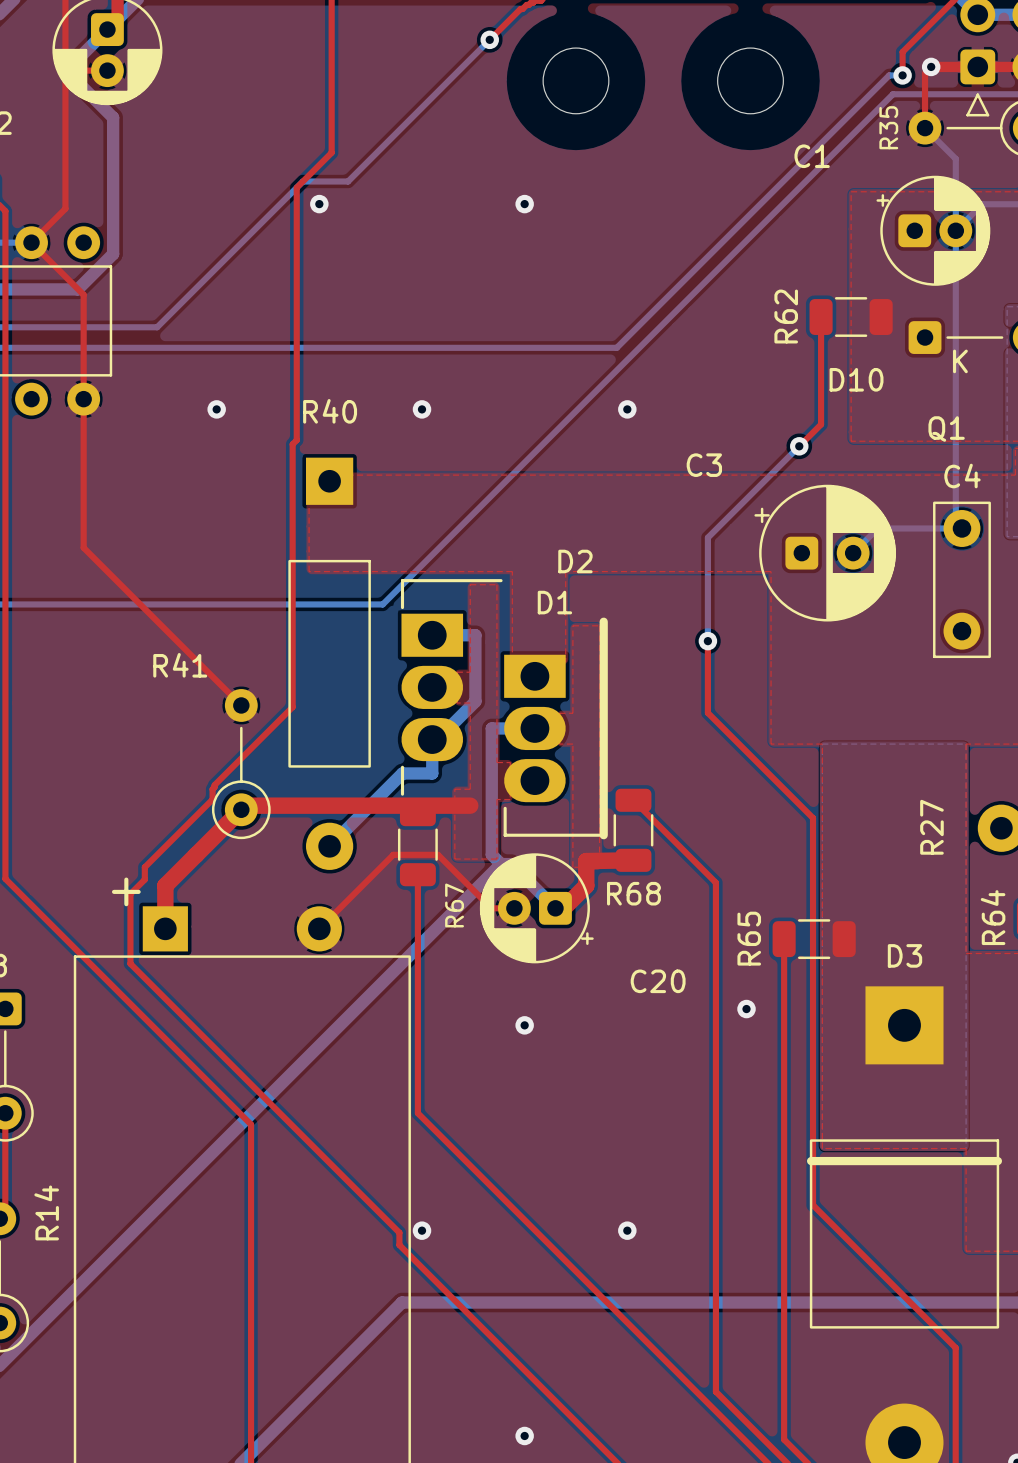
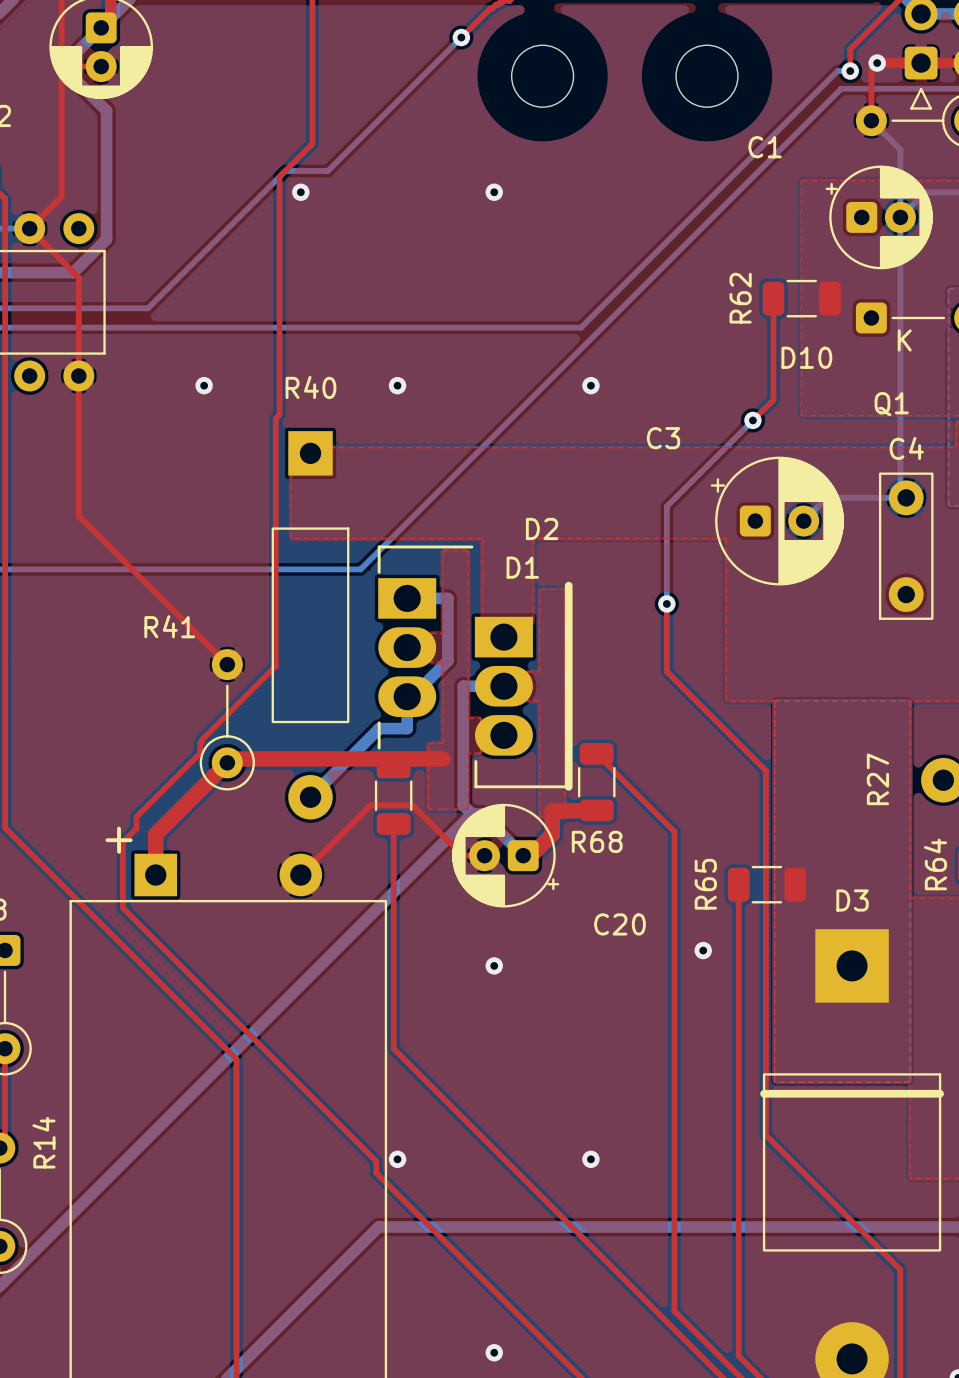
R35 name: R35 (888, 127) -> none
R67 name: R67 (454, 905) -> none

